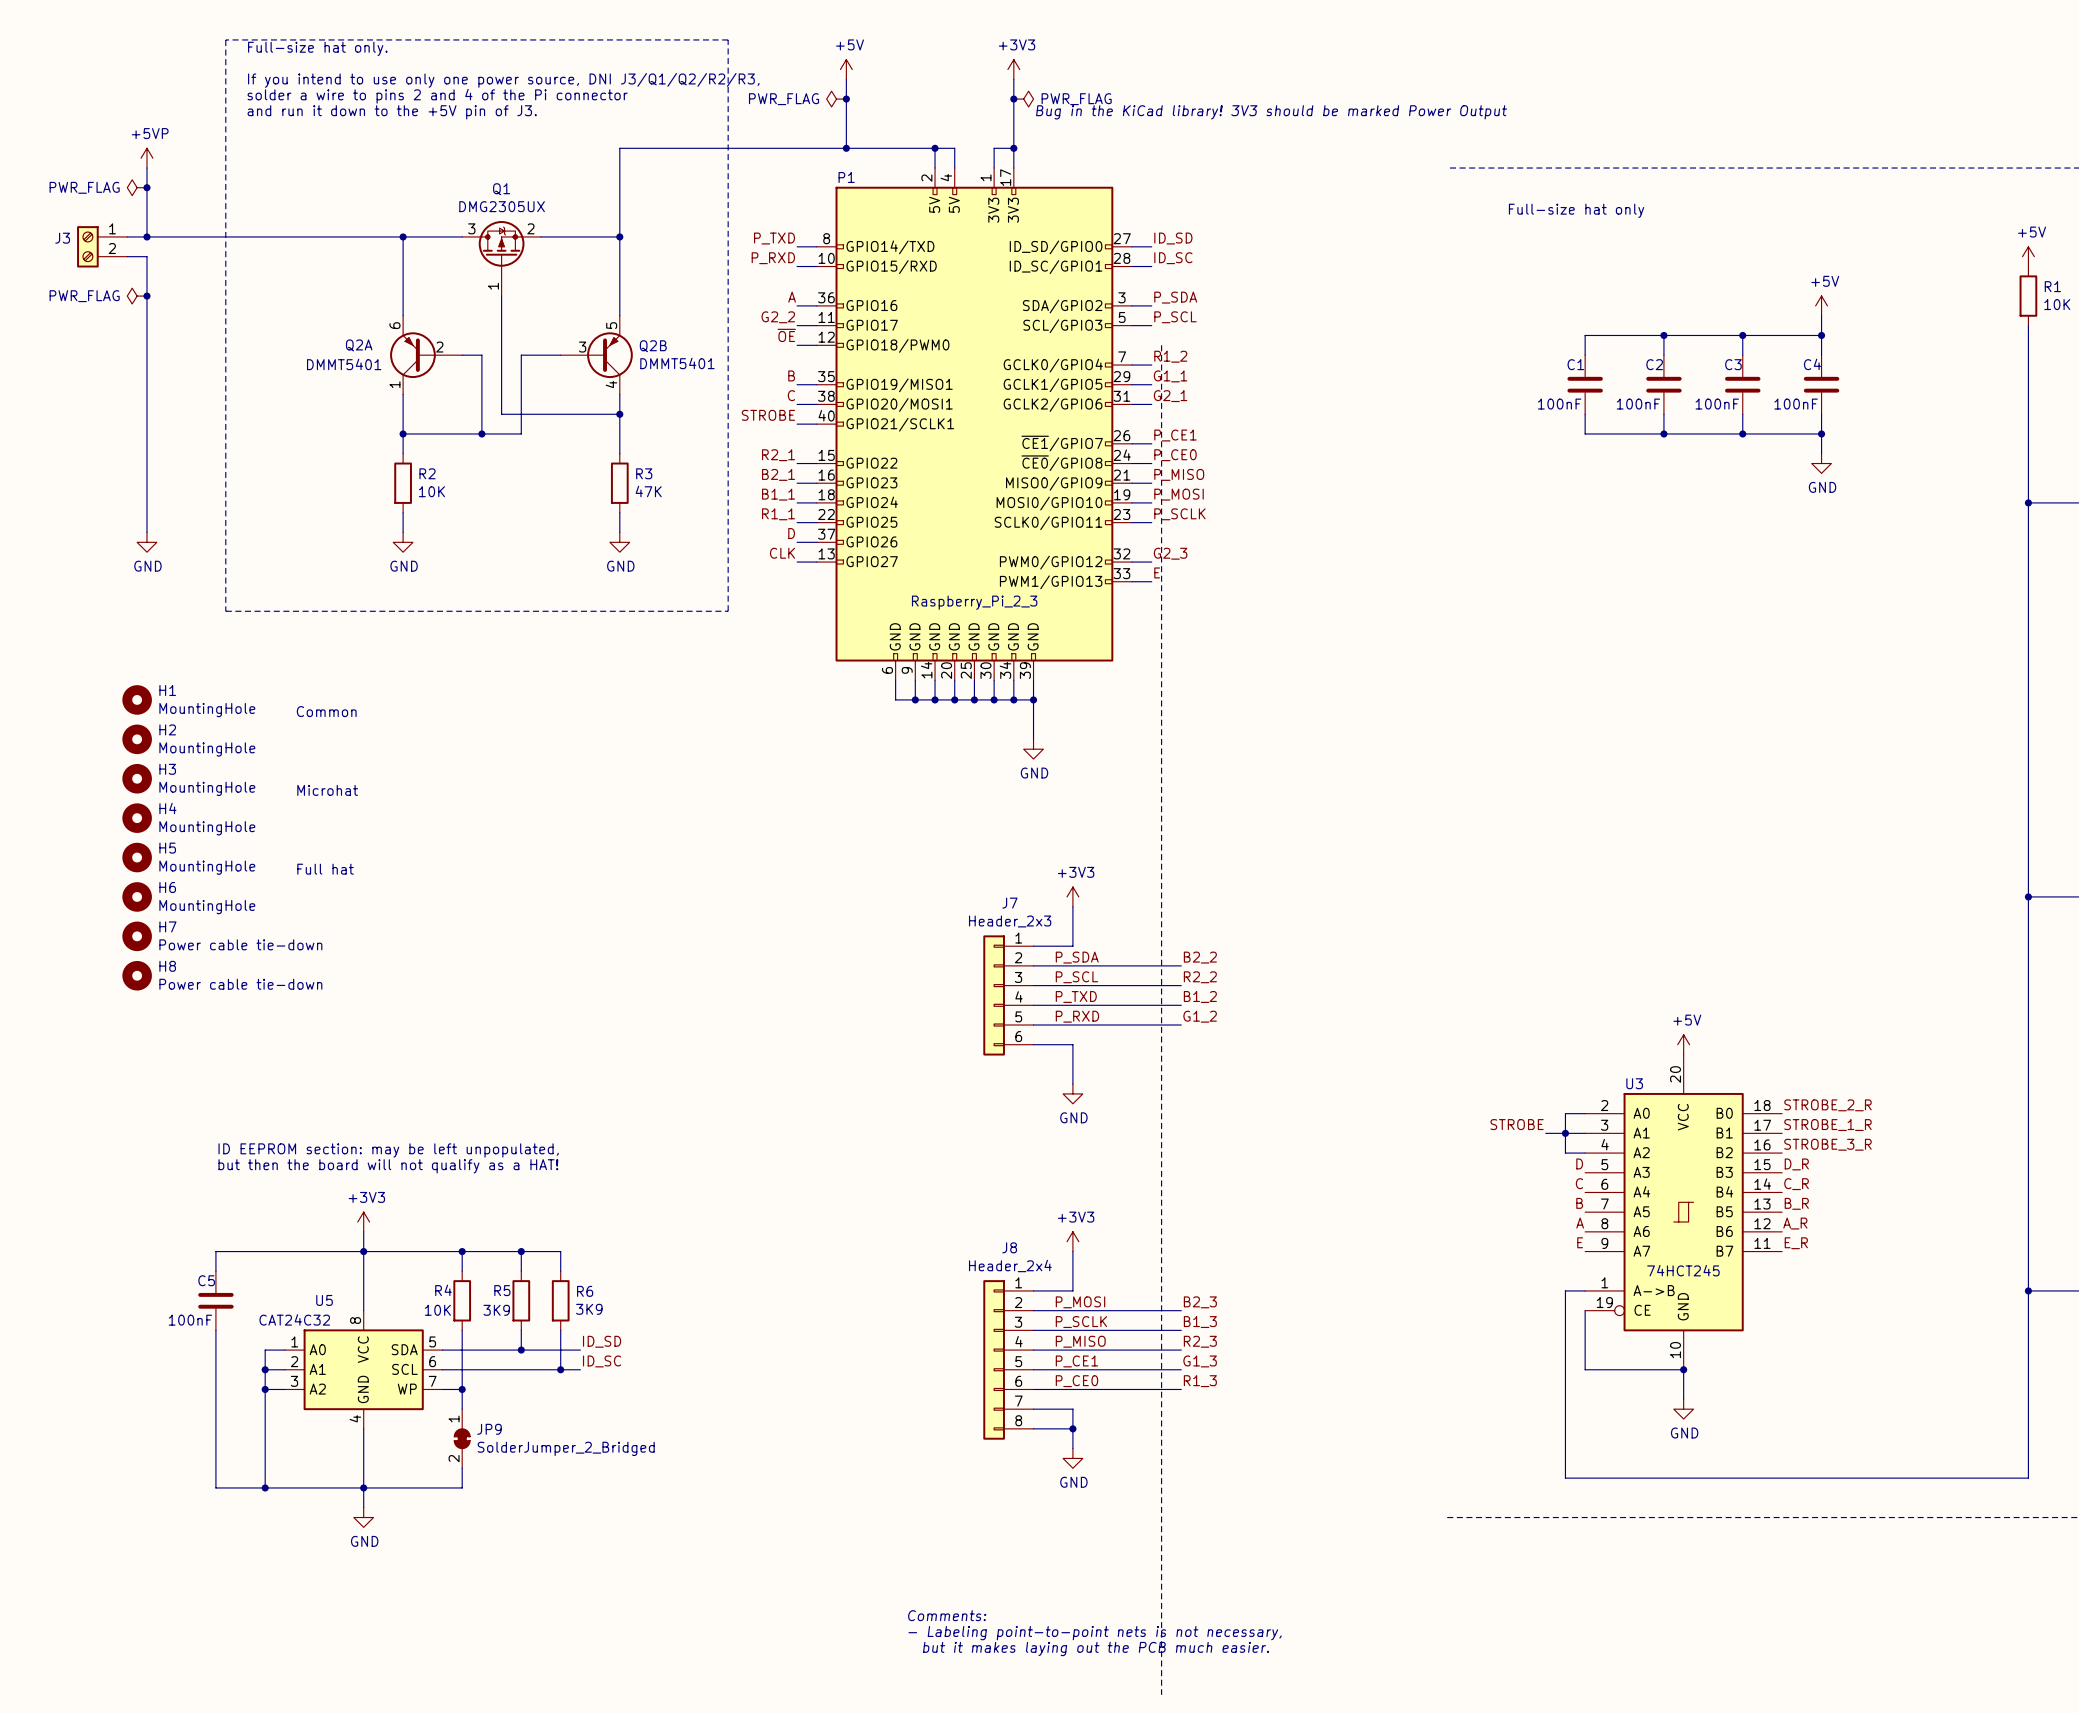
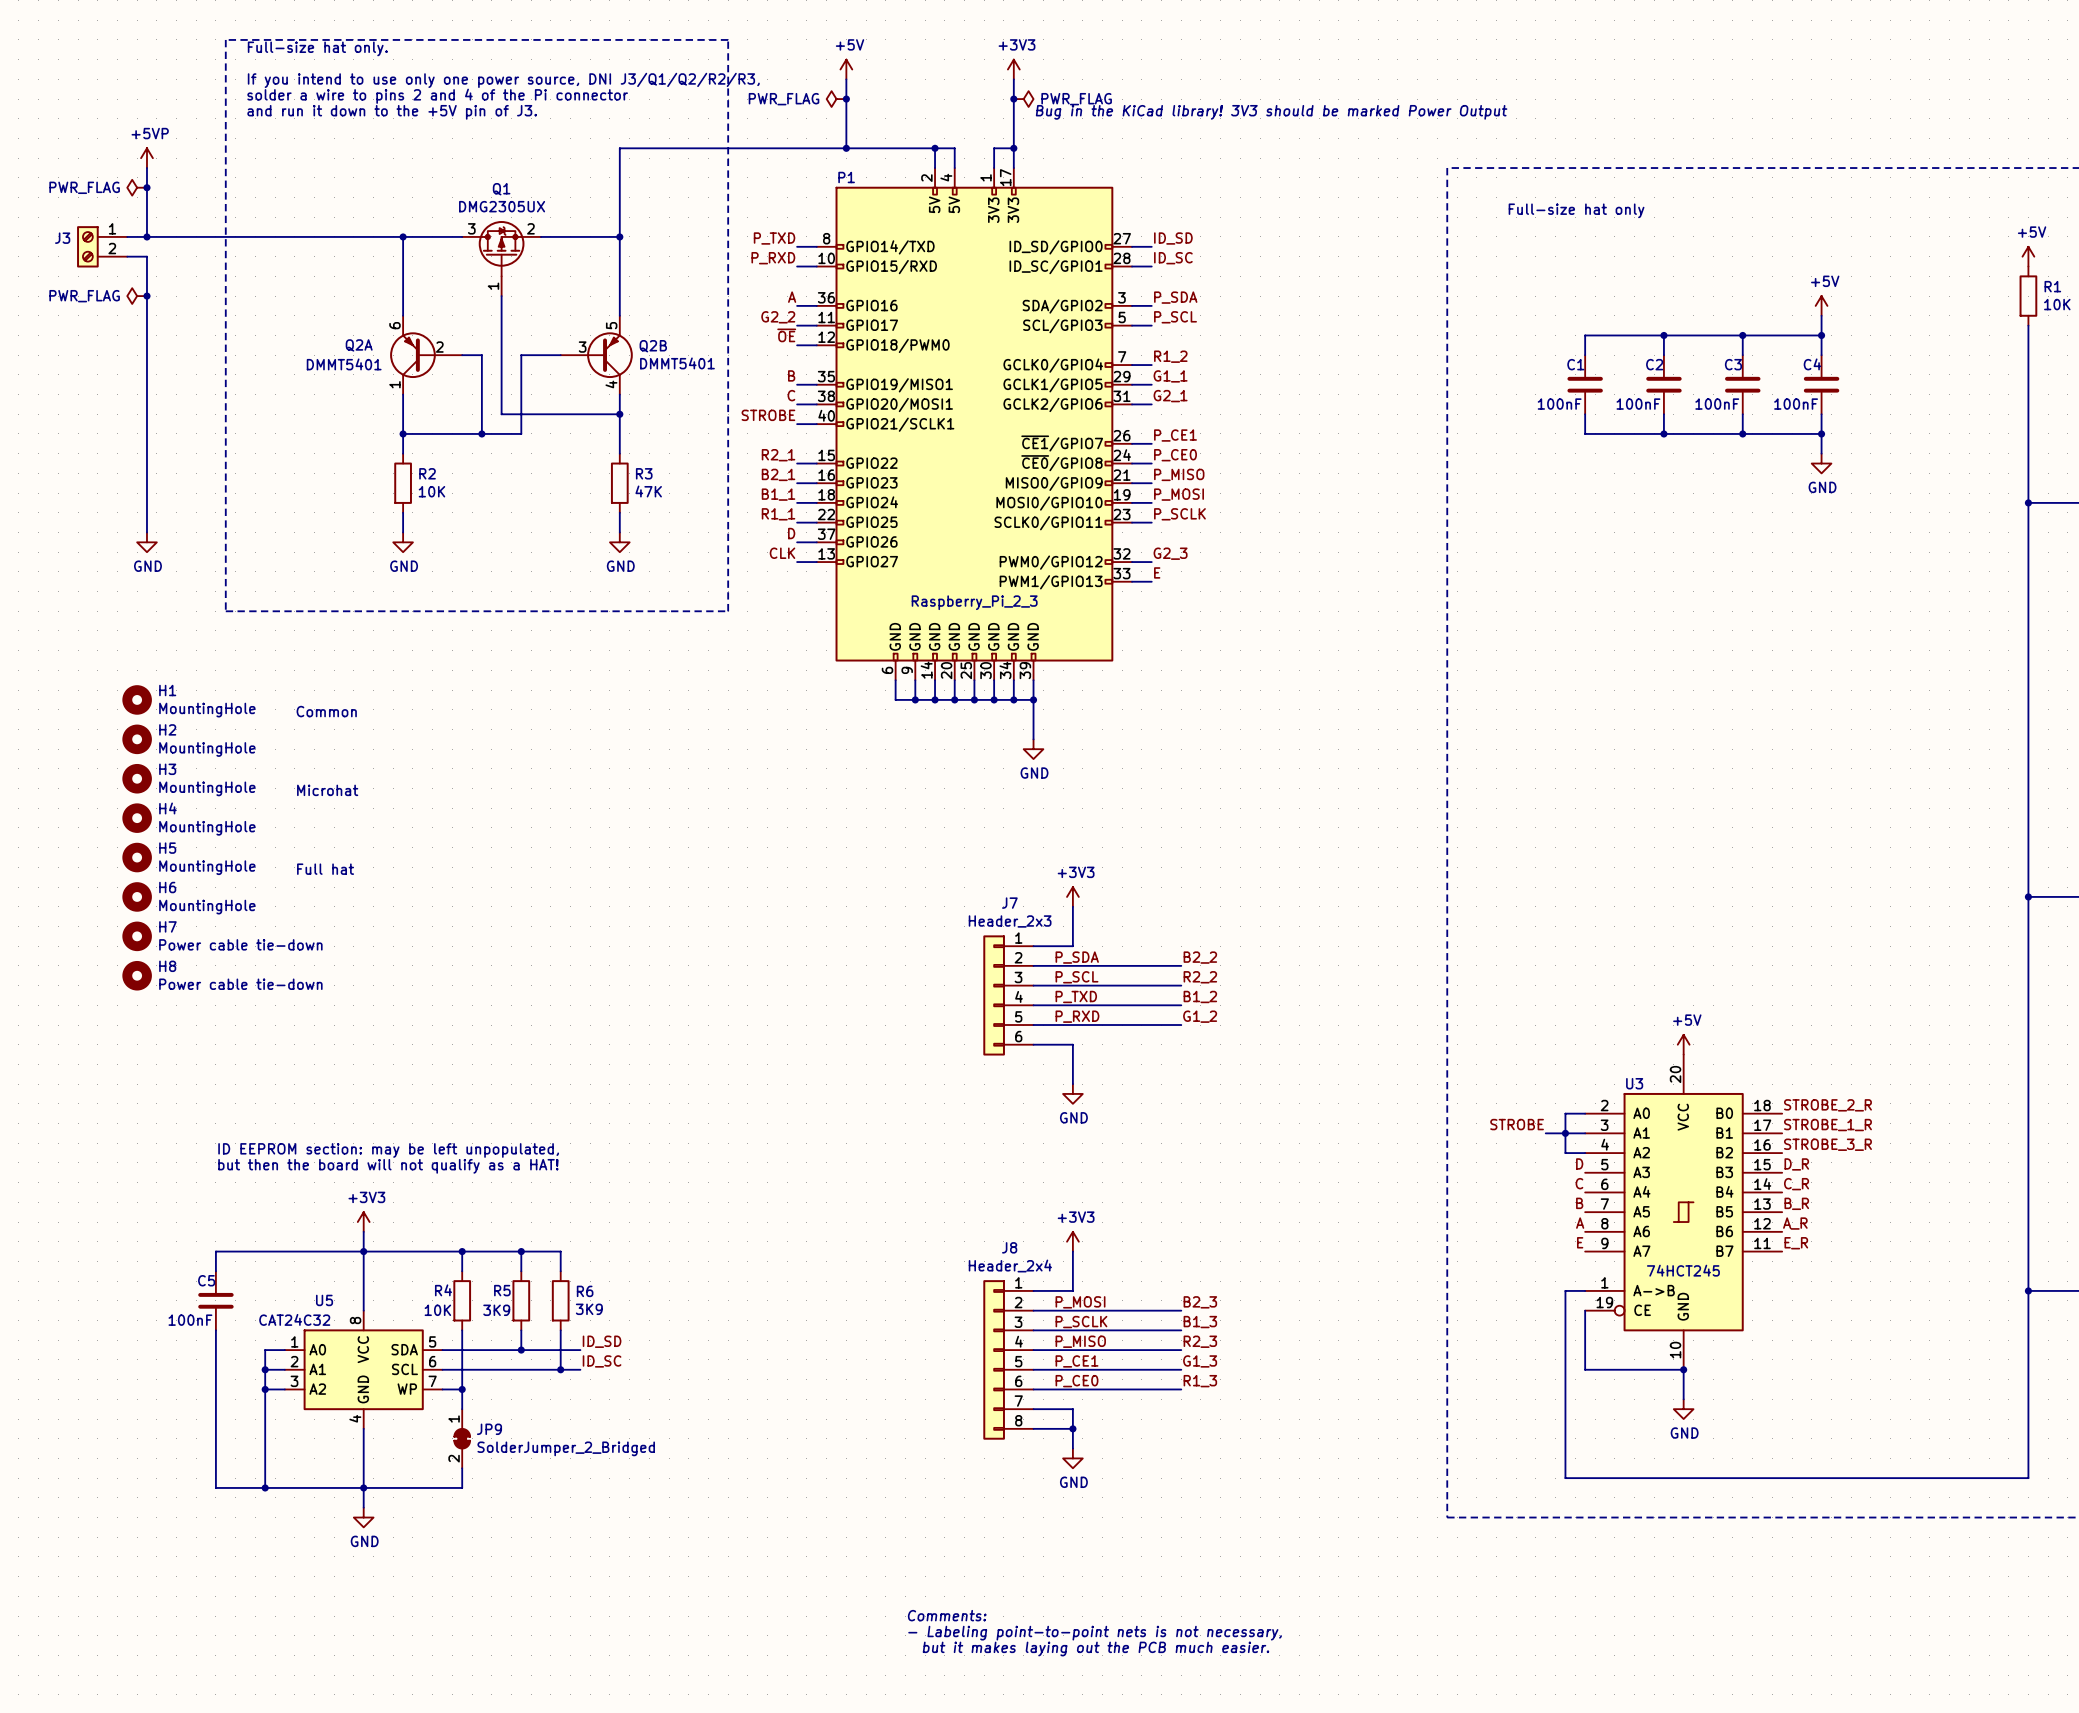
line: none -> (1447, 168) (1447, 1517)
line: (1161, 345) (1161, 1694) -> none

